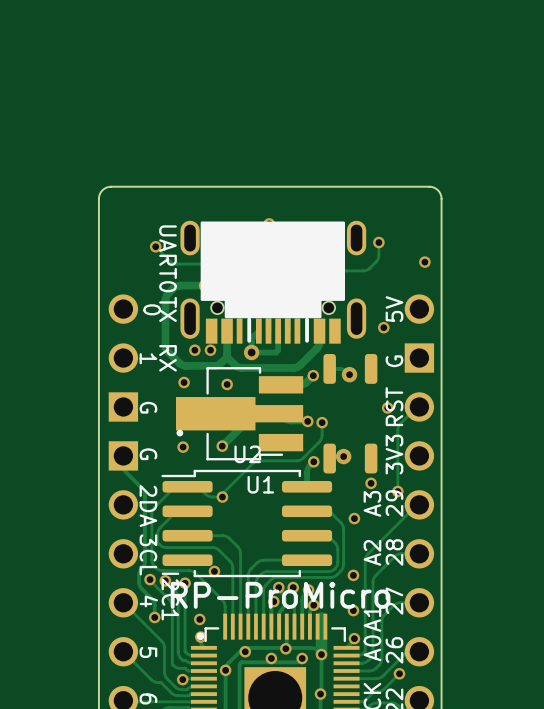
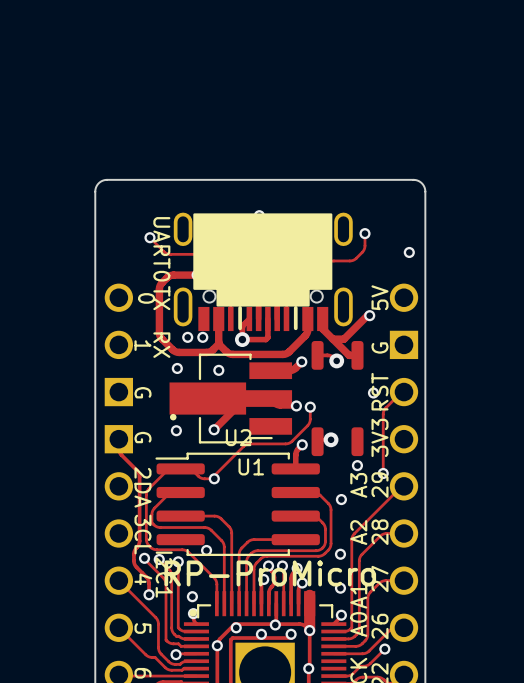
track: none -> (369, 315) (344, 339) (332, 339)
track: none -> (322, 319) (322, 328) (349, 355) (357, 355)

